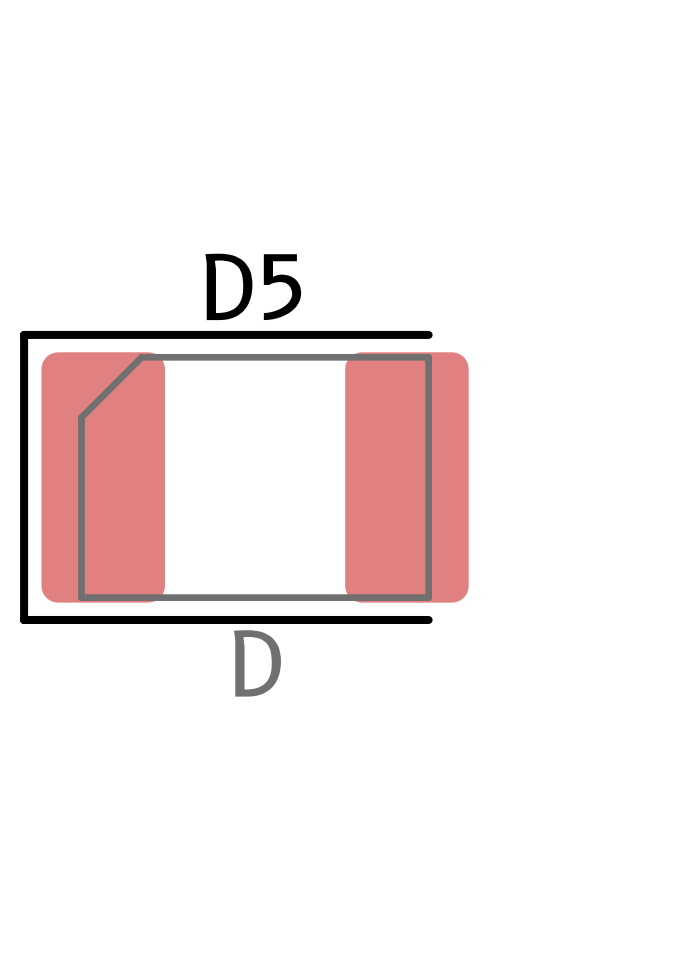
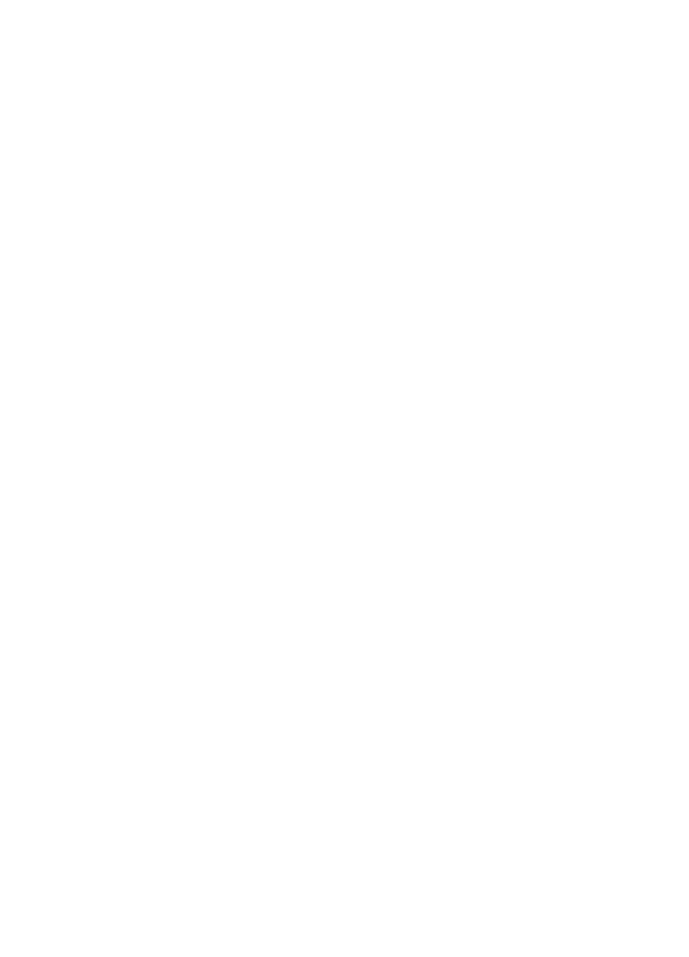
D5: D (244, 477) -> none

